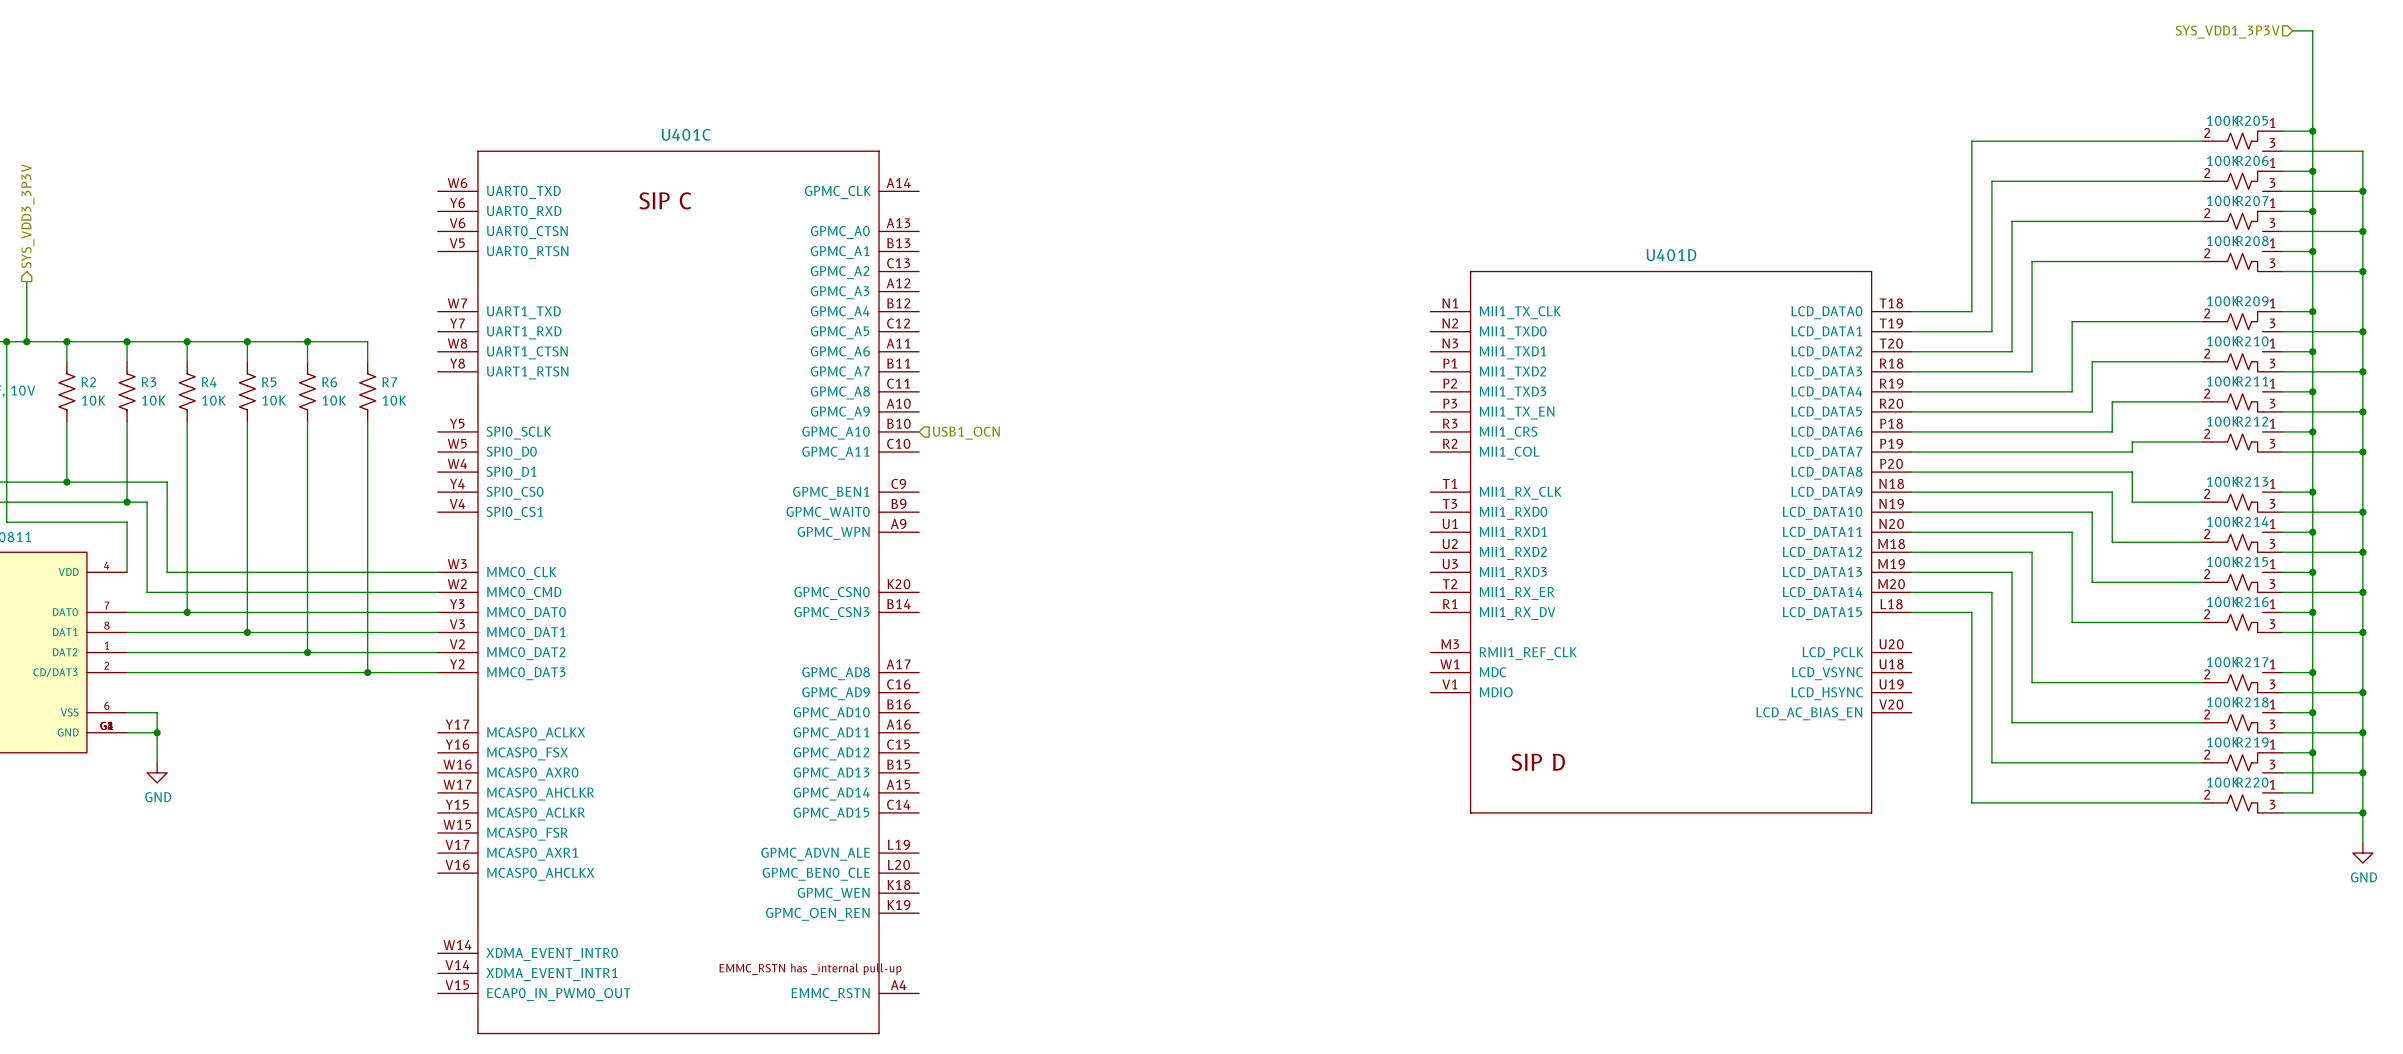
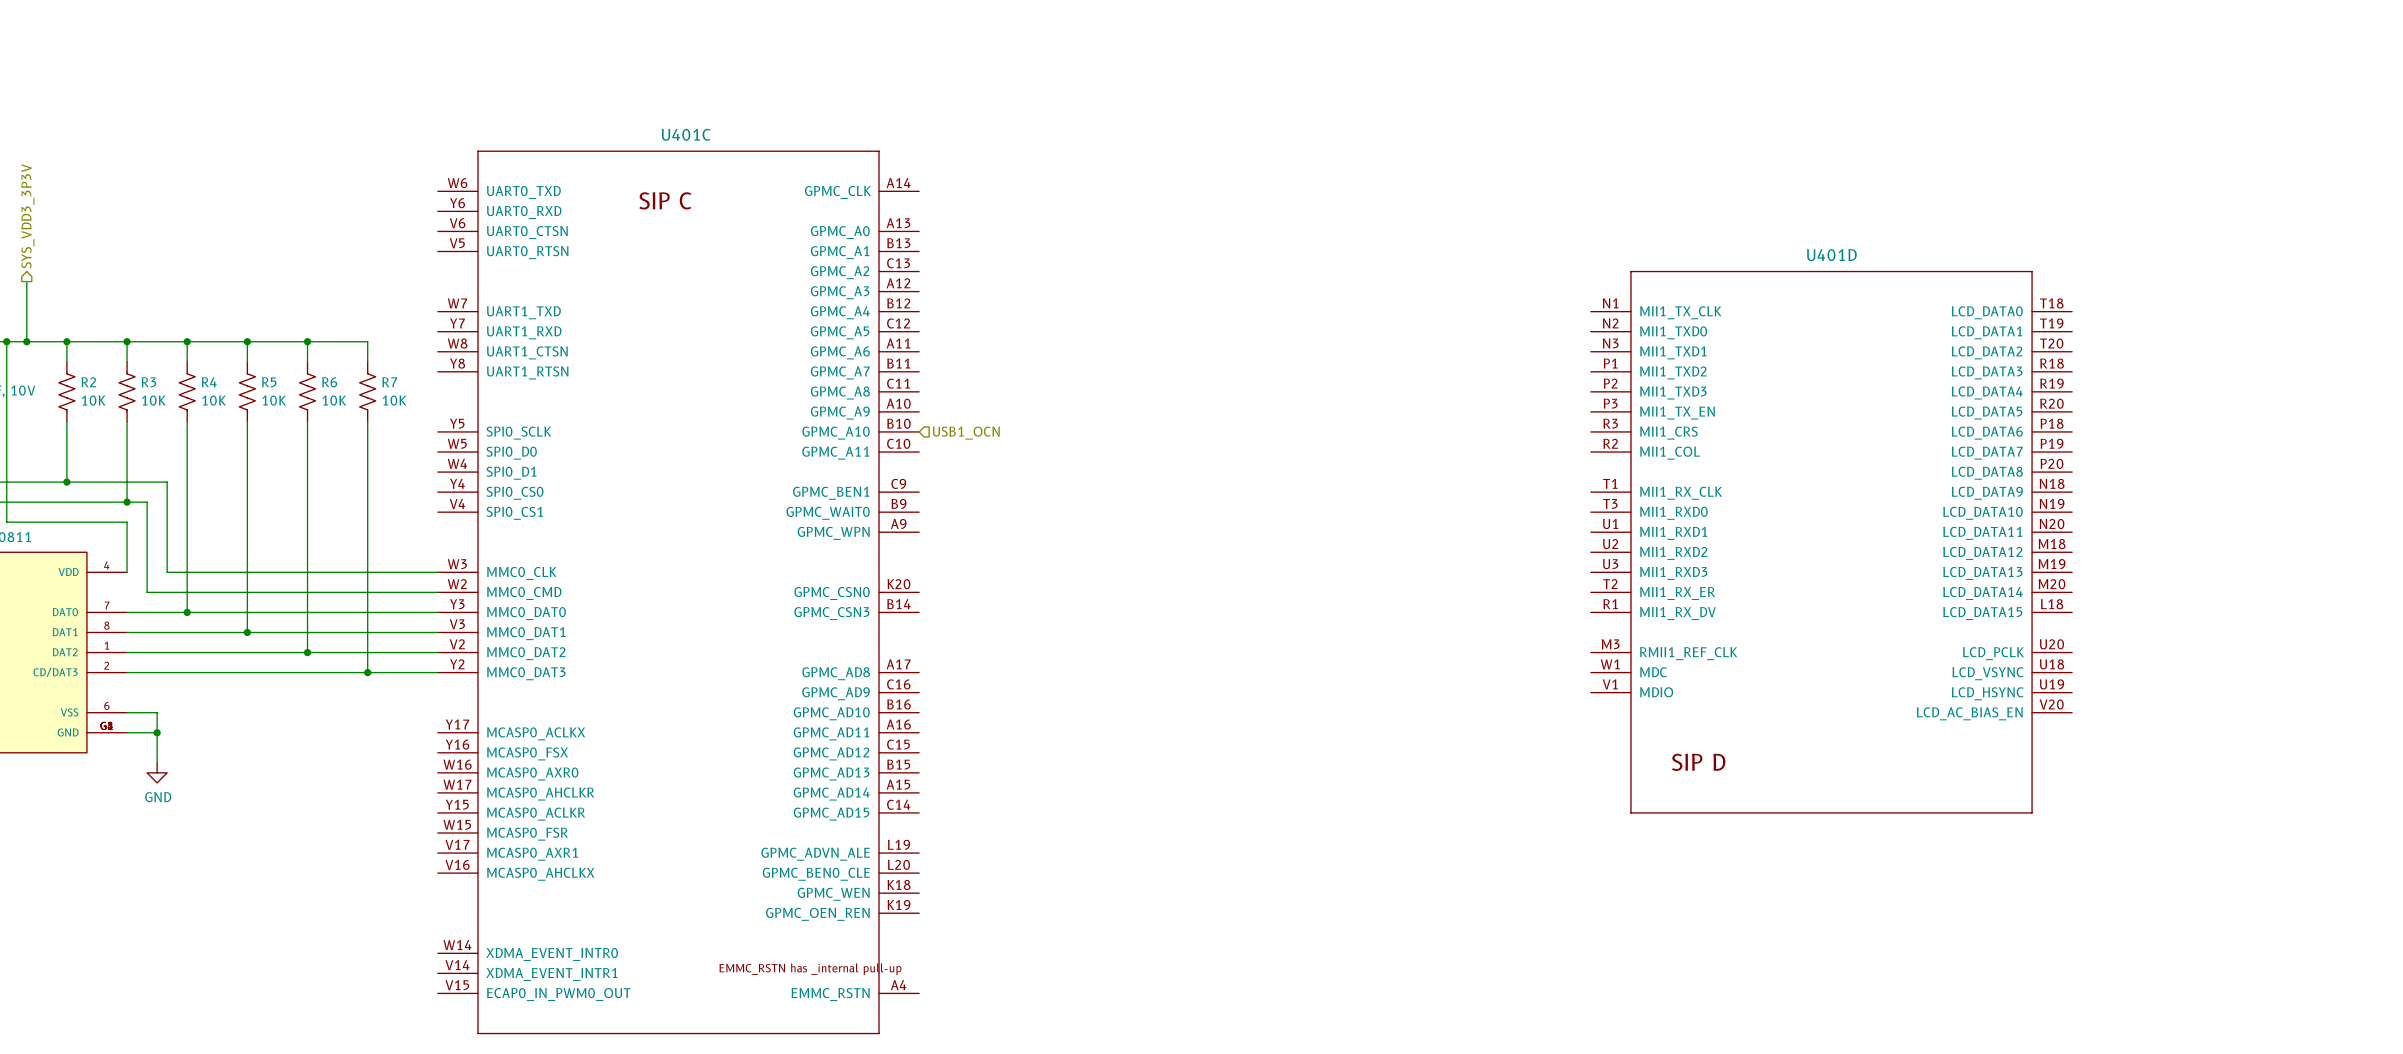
wire: (2292, 30) (2312, 30) (2312, 792) (2282, 792) -> none
hierarchical label: SYS_VDD1_3P3V (2227, 32) -> none
wire: (2282, 131) (2312, 131) -> none
junction: (2312, 131) -> none
wire: (2202, 141) (1971, 141) (1971, 311) (1911, 311) -> none
R205: 100K (2242, 141) -> none
wire: (2282, 151) (2362, 151) (2362, 843) -> none
wire: (2282, 171) (2312, 171) -> none
junction: (2312, 171) -> none
wire: (2202, 181) (1991, 181) (1991, 331) (1911, 331) -> none
R206: 100K (2242, 181) -> none
wire: (2282, 191) (2362, 191) -> none
junction: (2362, 191) -> none
wire: (2282, 211) (2312, 211) -> none
junction: (2312, 211) -> none
wire: (2202, 221) (2011, 221) (2011, 351) (1911, 351) -> none
R207: 100K (2242, 221) -> none
wire: (2282, 231) (2362, 231) -> none
junction: (2362, 231) -> none
wire: (2282, 251) (2312, 251) -> none
junction: (2312, 251) -> none
wire: (2202, 261) (2032, 261) (2032, 371) (1911, 371) -> none
R208: 100K (2242, 261) -> none
wire: (2282, 271) (2362, 271) -> none
junction: (2362, 271) -> none
wire: (2282, 311) (2312, 311) -> none
junction: (2312, 311) -> none
wire: (2202, 321) (2072, 321) (2072, 391) (1911, 391) -> none
R209: 100K (2242, 321) -> none
wire: (2282, 331) (2362, 331) -> none
junction: (2362, 331) -> none
wire: (2282, 351) (2312, 351) -> none
junction: (2312, 351) -> none
wire: (2202, 361) (2092, 361) (2092, 411) (1911, 411) -> none
R210: 100K (2242, 361) -> none
wire: (2282, 371) (2362, 371) -> none
junction: (2362, 371) -> none
wire: (2282, 391) (2312, 391) -> none
junction: (2312, 391) -> none
wire: (2202, 401) (2112, 401) (2112, 431) (1911, 431) -> none
R211: 100K (2242, 401) -> none
wire: (2282, 411) (2362, 411) -> none
junction: (2362, 411) -> none
wire: (2282, 431) (2312, 431) -> none
junction: (2312, 431) -> none
wire: (2202, 441) (2132, 441) (2132, 452) (1911, 452) -> none
R212: 100K (2242, 441) -> none
wire: (2282, 452) (2362, 452) -> none
junction: (2362, 452) -> none
wire: (1911, 472) (2132, 472) (2132, 502) (2202, 502) -> none
wire: (1911, 492) (2112, 492) (2112, 542) (2202, 542) -> none
wire: (2282, 492) (2312, 492) -> none
junction: (2312, 492) -> none
R213: 100K (2242, 502) -> none
wire: (1911, 512) (2092, 512) (2092, 582) (2202, 582) -> none
wire: (2282, 512) (2362, 512) -> none
junction: (2362, 512) -> none
wire: (1911, 532) (2072, 532) (2072, 622) (2202, 622) -> none
wire: (2282, 532) (2312, 532) -> none
junction: (2312, 532) -> none
U401D position: (1671, 542) -> (1831, 542)
R214: 100K (2242, 542) -> none
wire: (1911, 552) (2032, 552) (2032, 682) (2202, 682) -> none
wire: (2282, 552) (2362, 552) -> none
junction: (2362, 552) -> none
wire: (1911, 572) (2011, 572) (2011, 722) (2202, 722) -> none
wire: (2282, 572) (2312, 572) -> none
junction: (2312, 572) -> none
R215: 100K (2242, 582) -> none
wire: (1911, 592) (1991, 592) (1991, 762) (2202, 762) -> none
wire: (2282, 592) (2362, 592) -> none
junction: (2362, 592) -> none
wire: (1911, 612) (1971, 612) (1971, 802) (2202, 802) -> none
wire: (2282, 612) (2312, 612) -> none
junction: (2312, 612) -> none
R216: 100K (2242, 622) -> none
wire: (2282, 632) (2362, 632) -> none
junction: (2362, 632) -> none
wire: (2282, 672) (2312, 672) -> none
junction: (2312, 672) -> none
R217: 100K (2242, 682) -> none
wire: (2282, 692) (2362, 692) -> none
junction: (2362, 692) -> none
wire: (2282, 712) (2312, 712) -> none
junction: (2312, 712) -> none
R218: 100K (2242, 722) -> none
wire: (2282, 732) (2362, 732) -> none
junction: (2362, 732) -> none
wire: (2282, 752) (2312, 752) -> none
junction: (2312, 752) -> none
R219: 100K (2242, 762) -> none
wire: (2282, 772) (2362, 772) -> none
junction: (2362, 772) -> none
R220: 100K (2242, 802) -> none
wire: (2282, 812) (2362, 812) -> none
junction: (2362, 812) -> none
power symbol: GND (2362, 853) -> none

